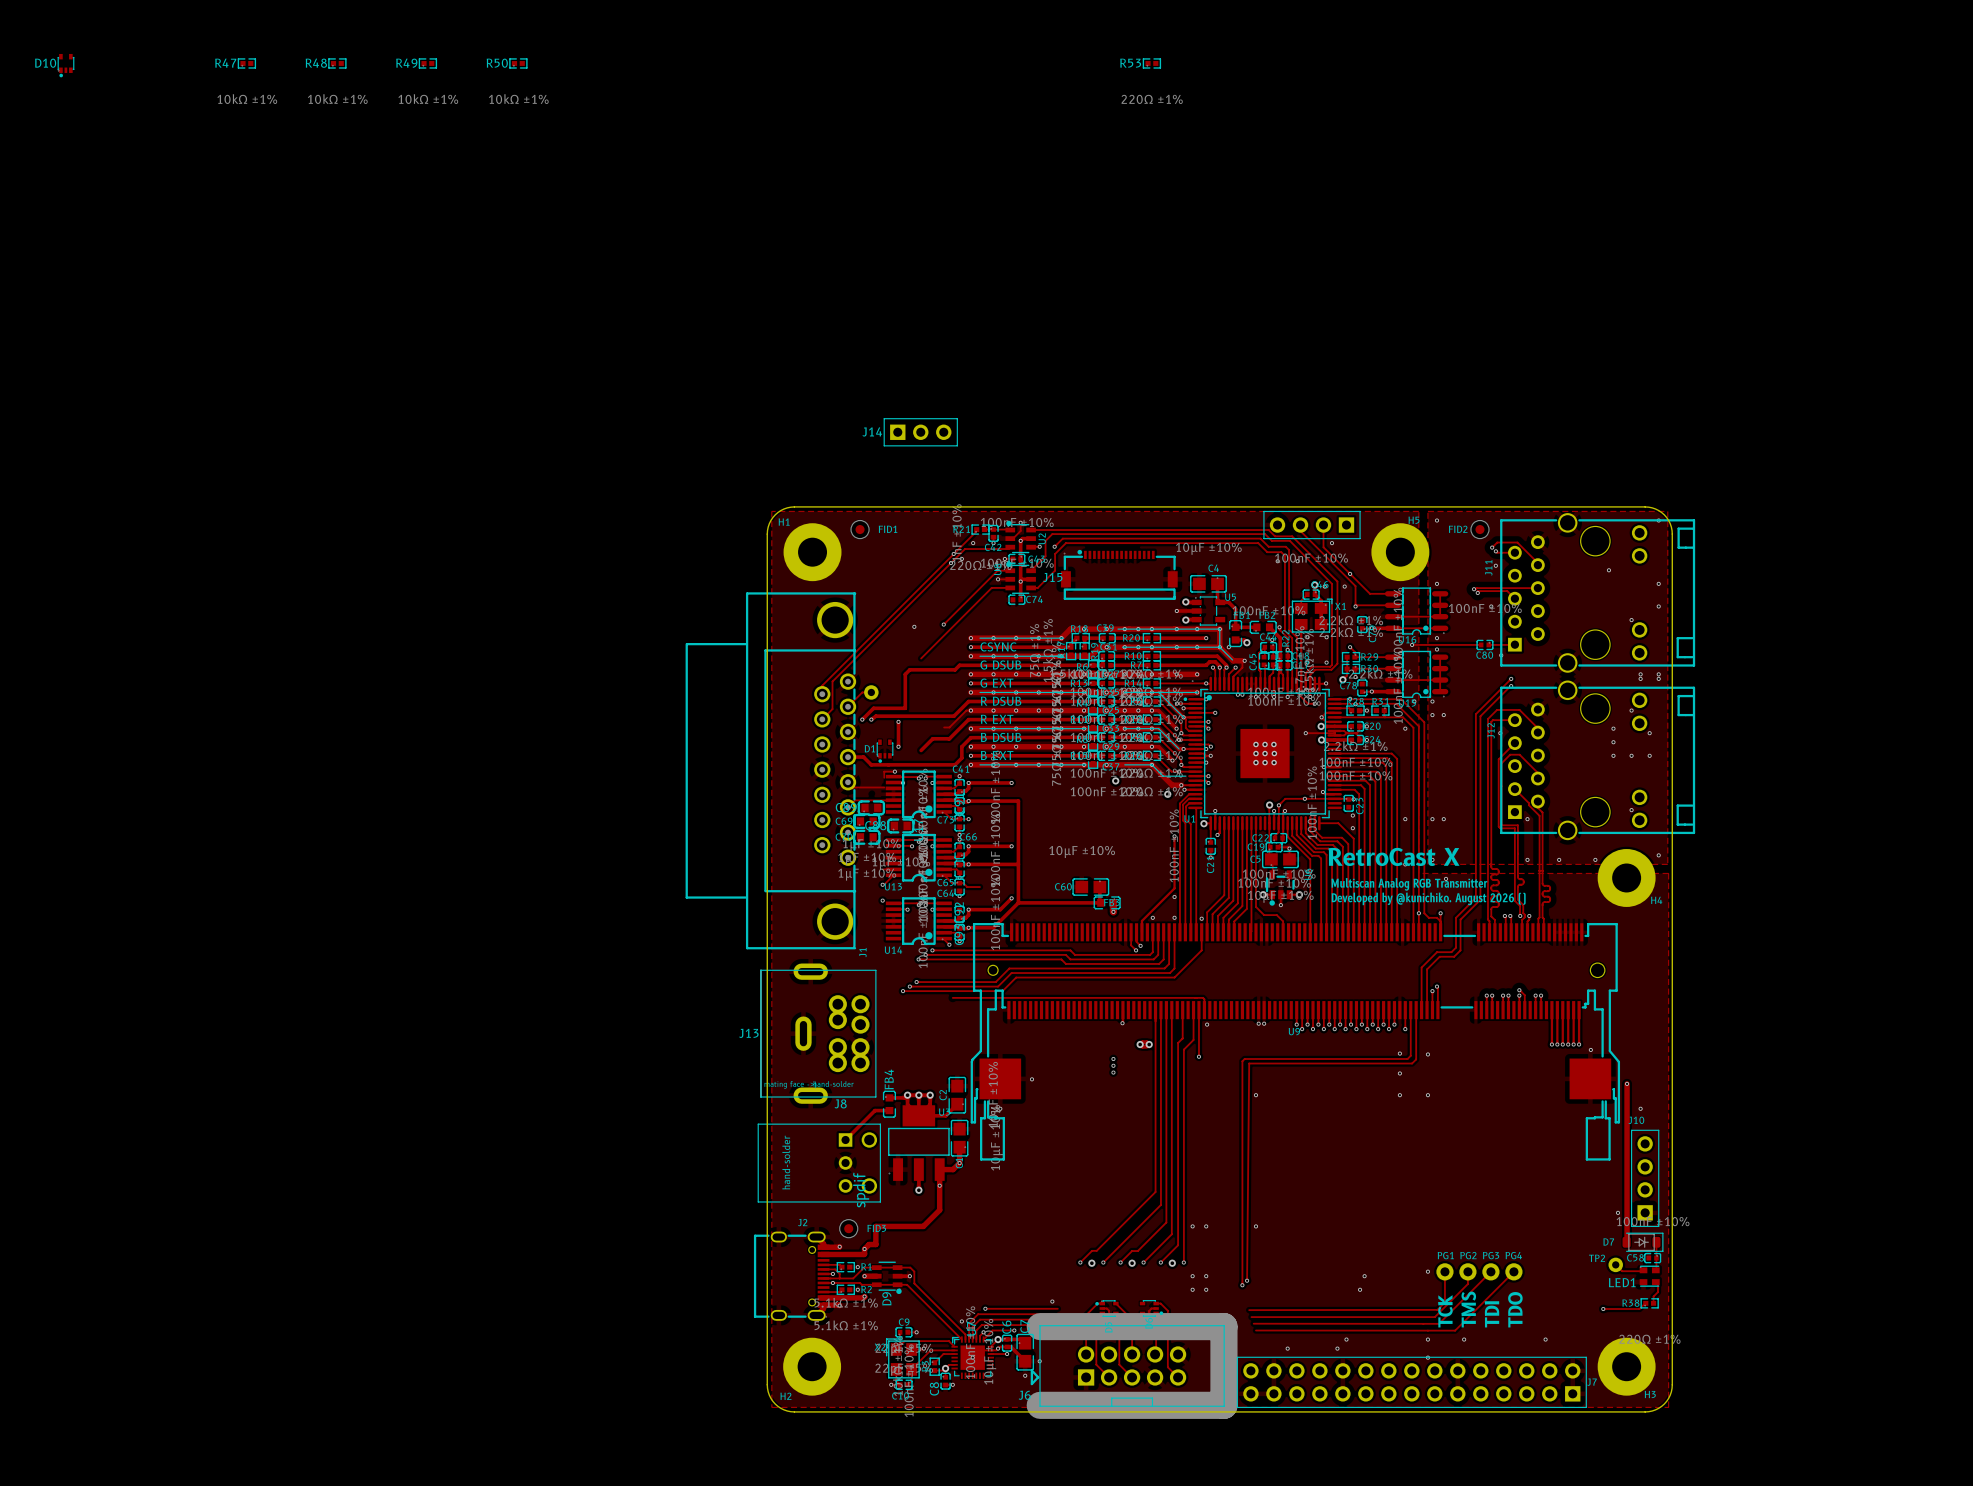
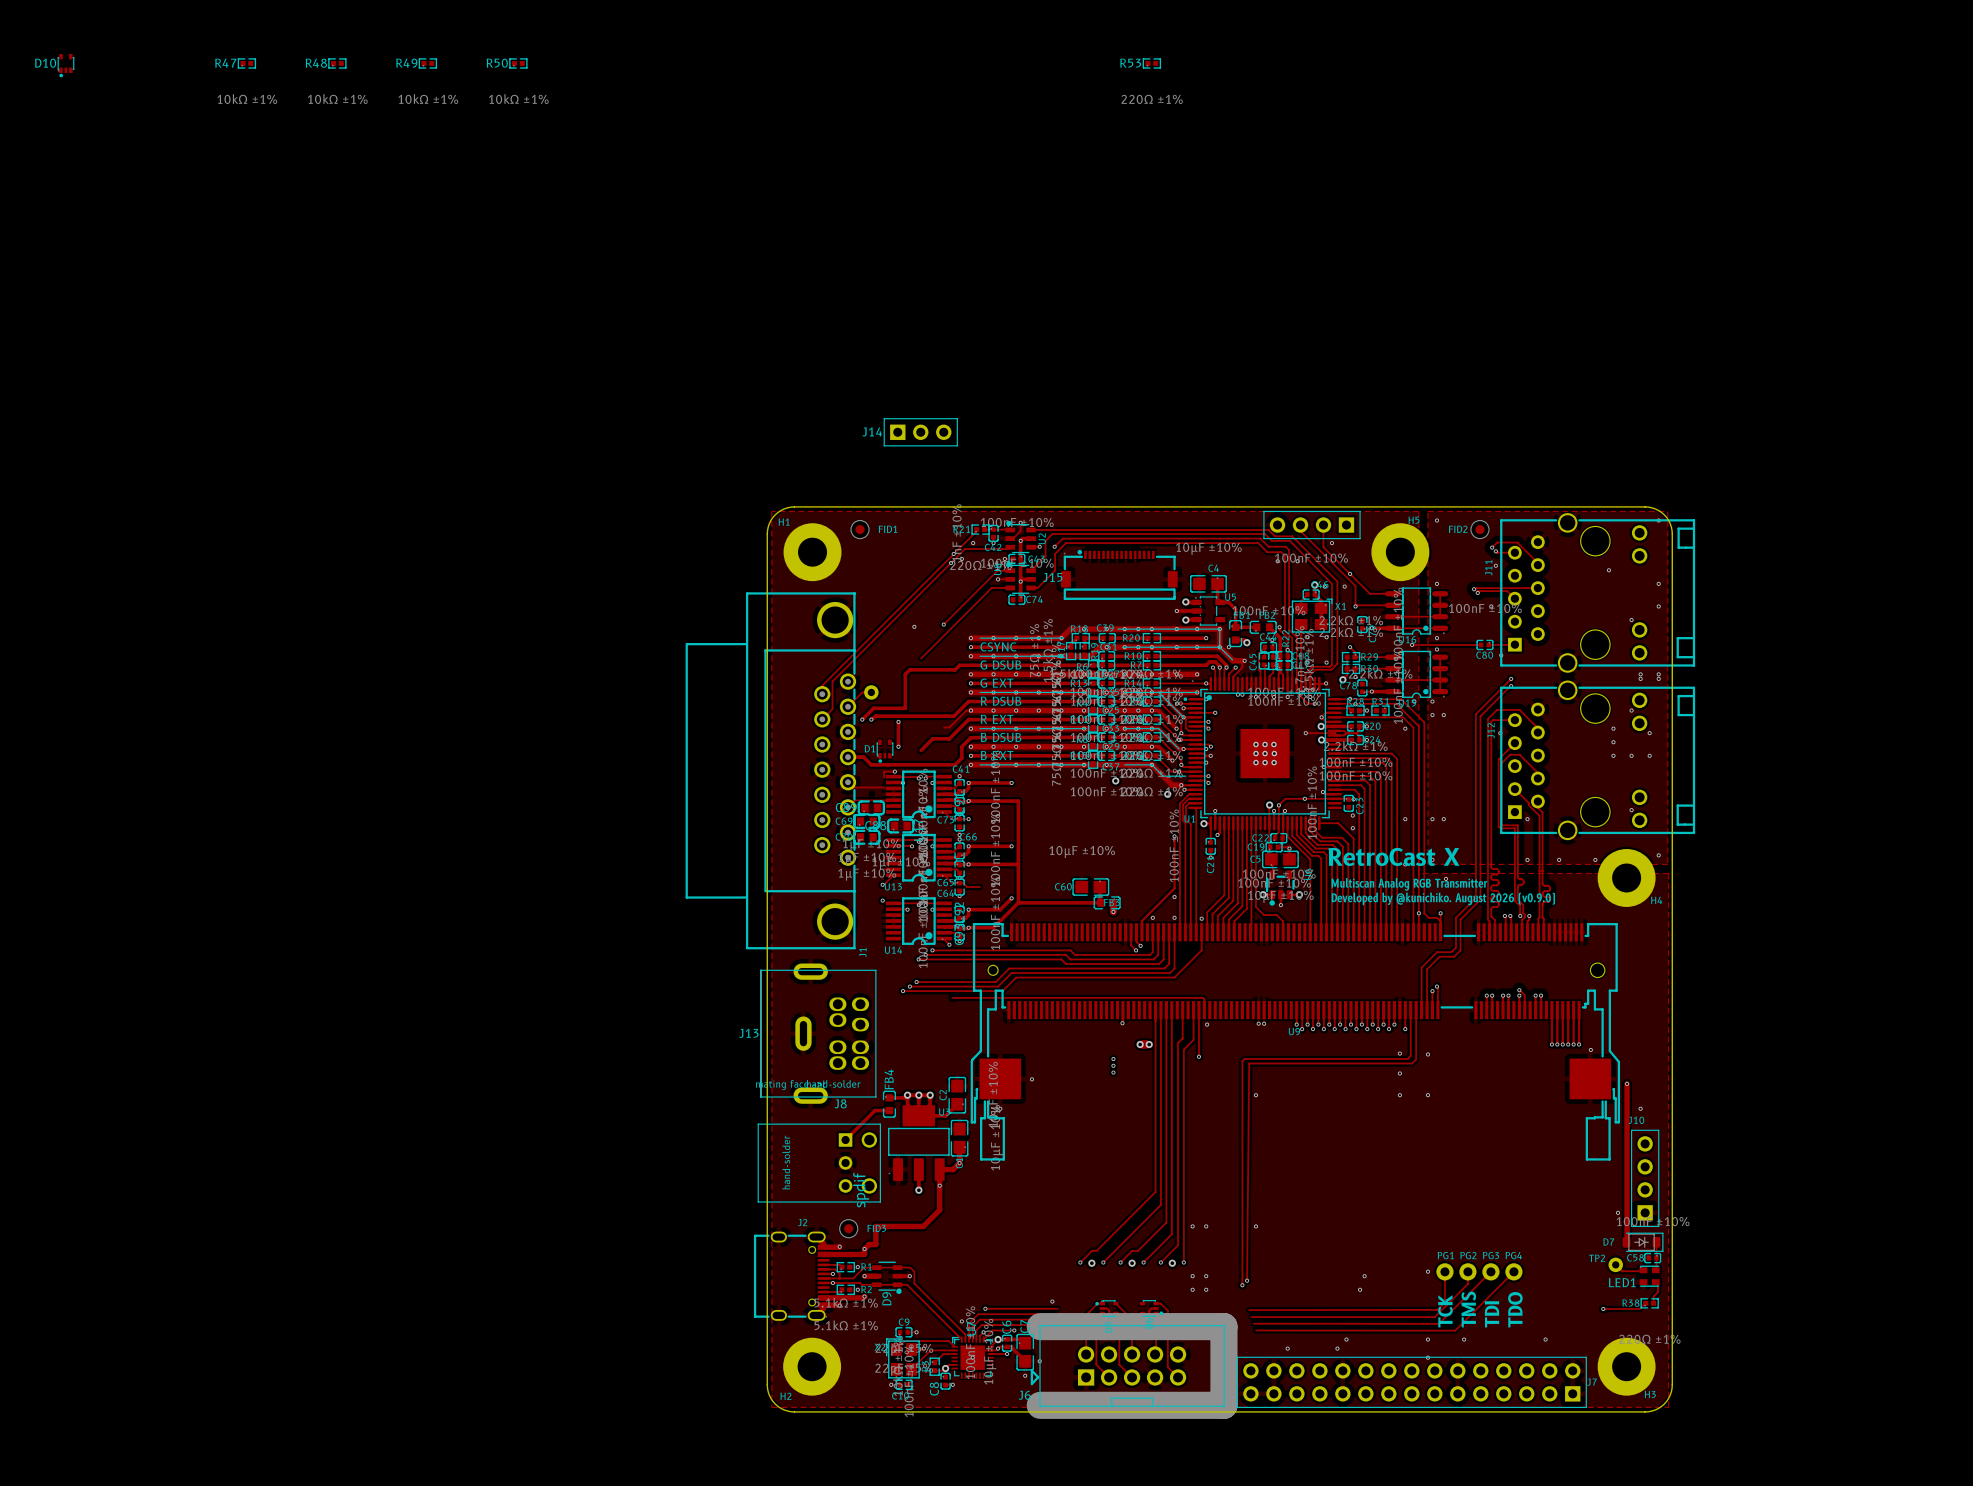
text: Developed by @kunichiko. August 2026 () (1428, 898) -> Developed by @kunichiko. August 2026 (v0.9.0) (1443, 898)
J13 footprint: [760, 963, 877, 1104] -> [760, 963, 877, 1104]

